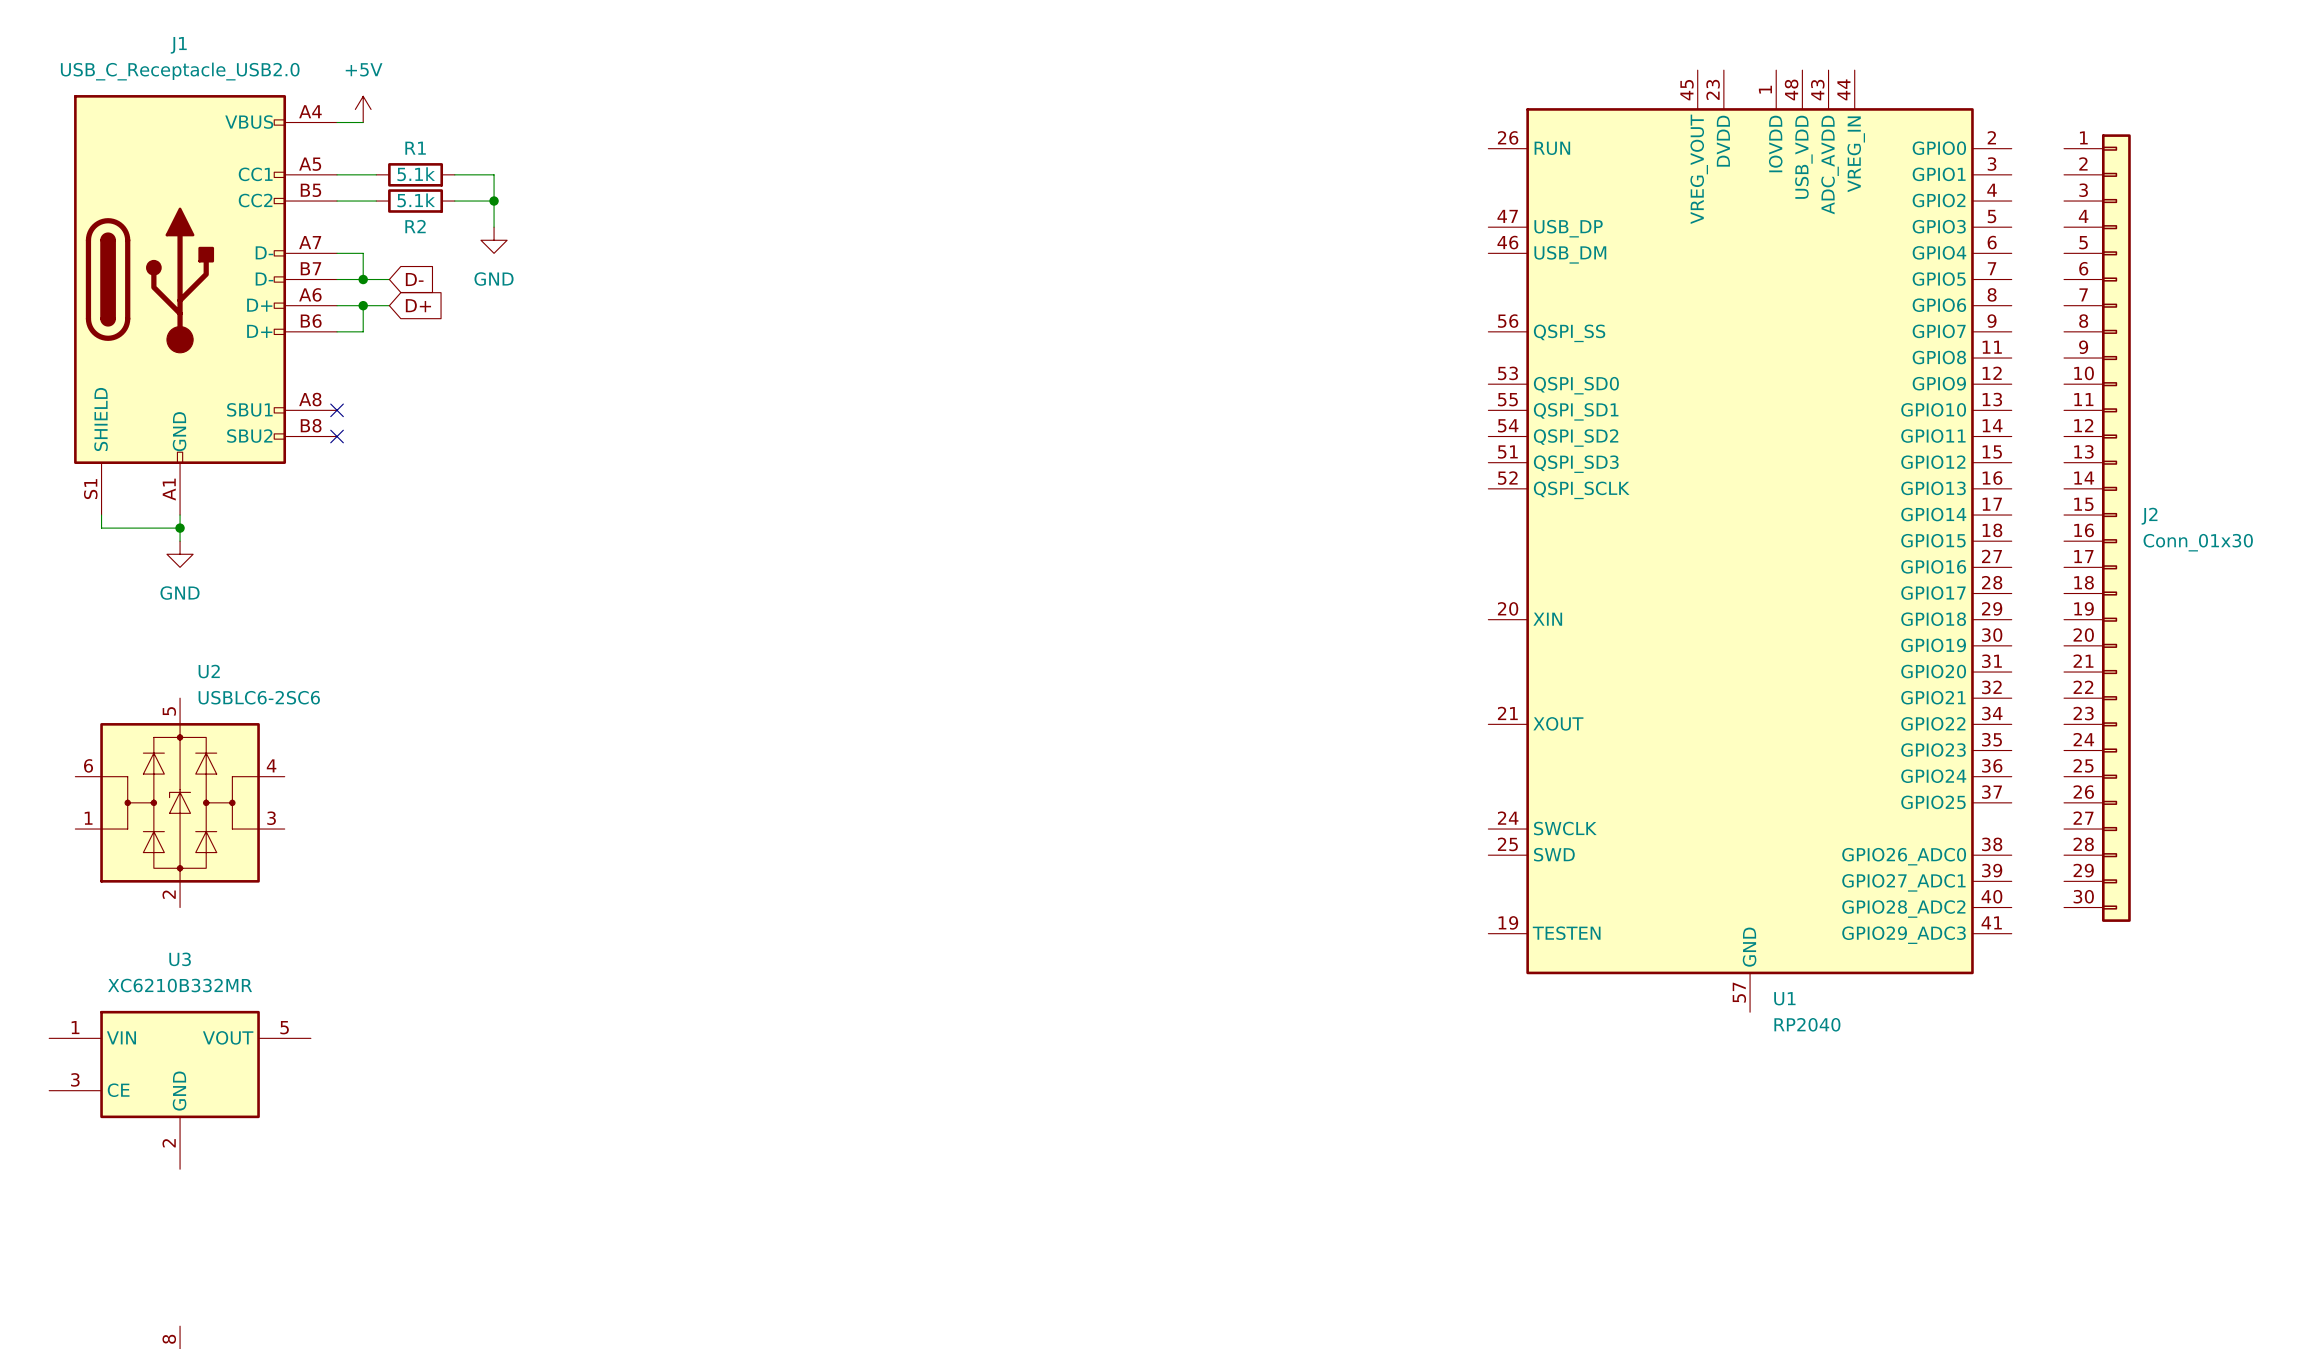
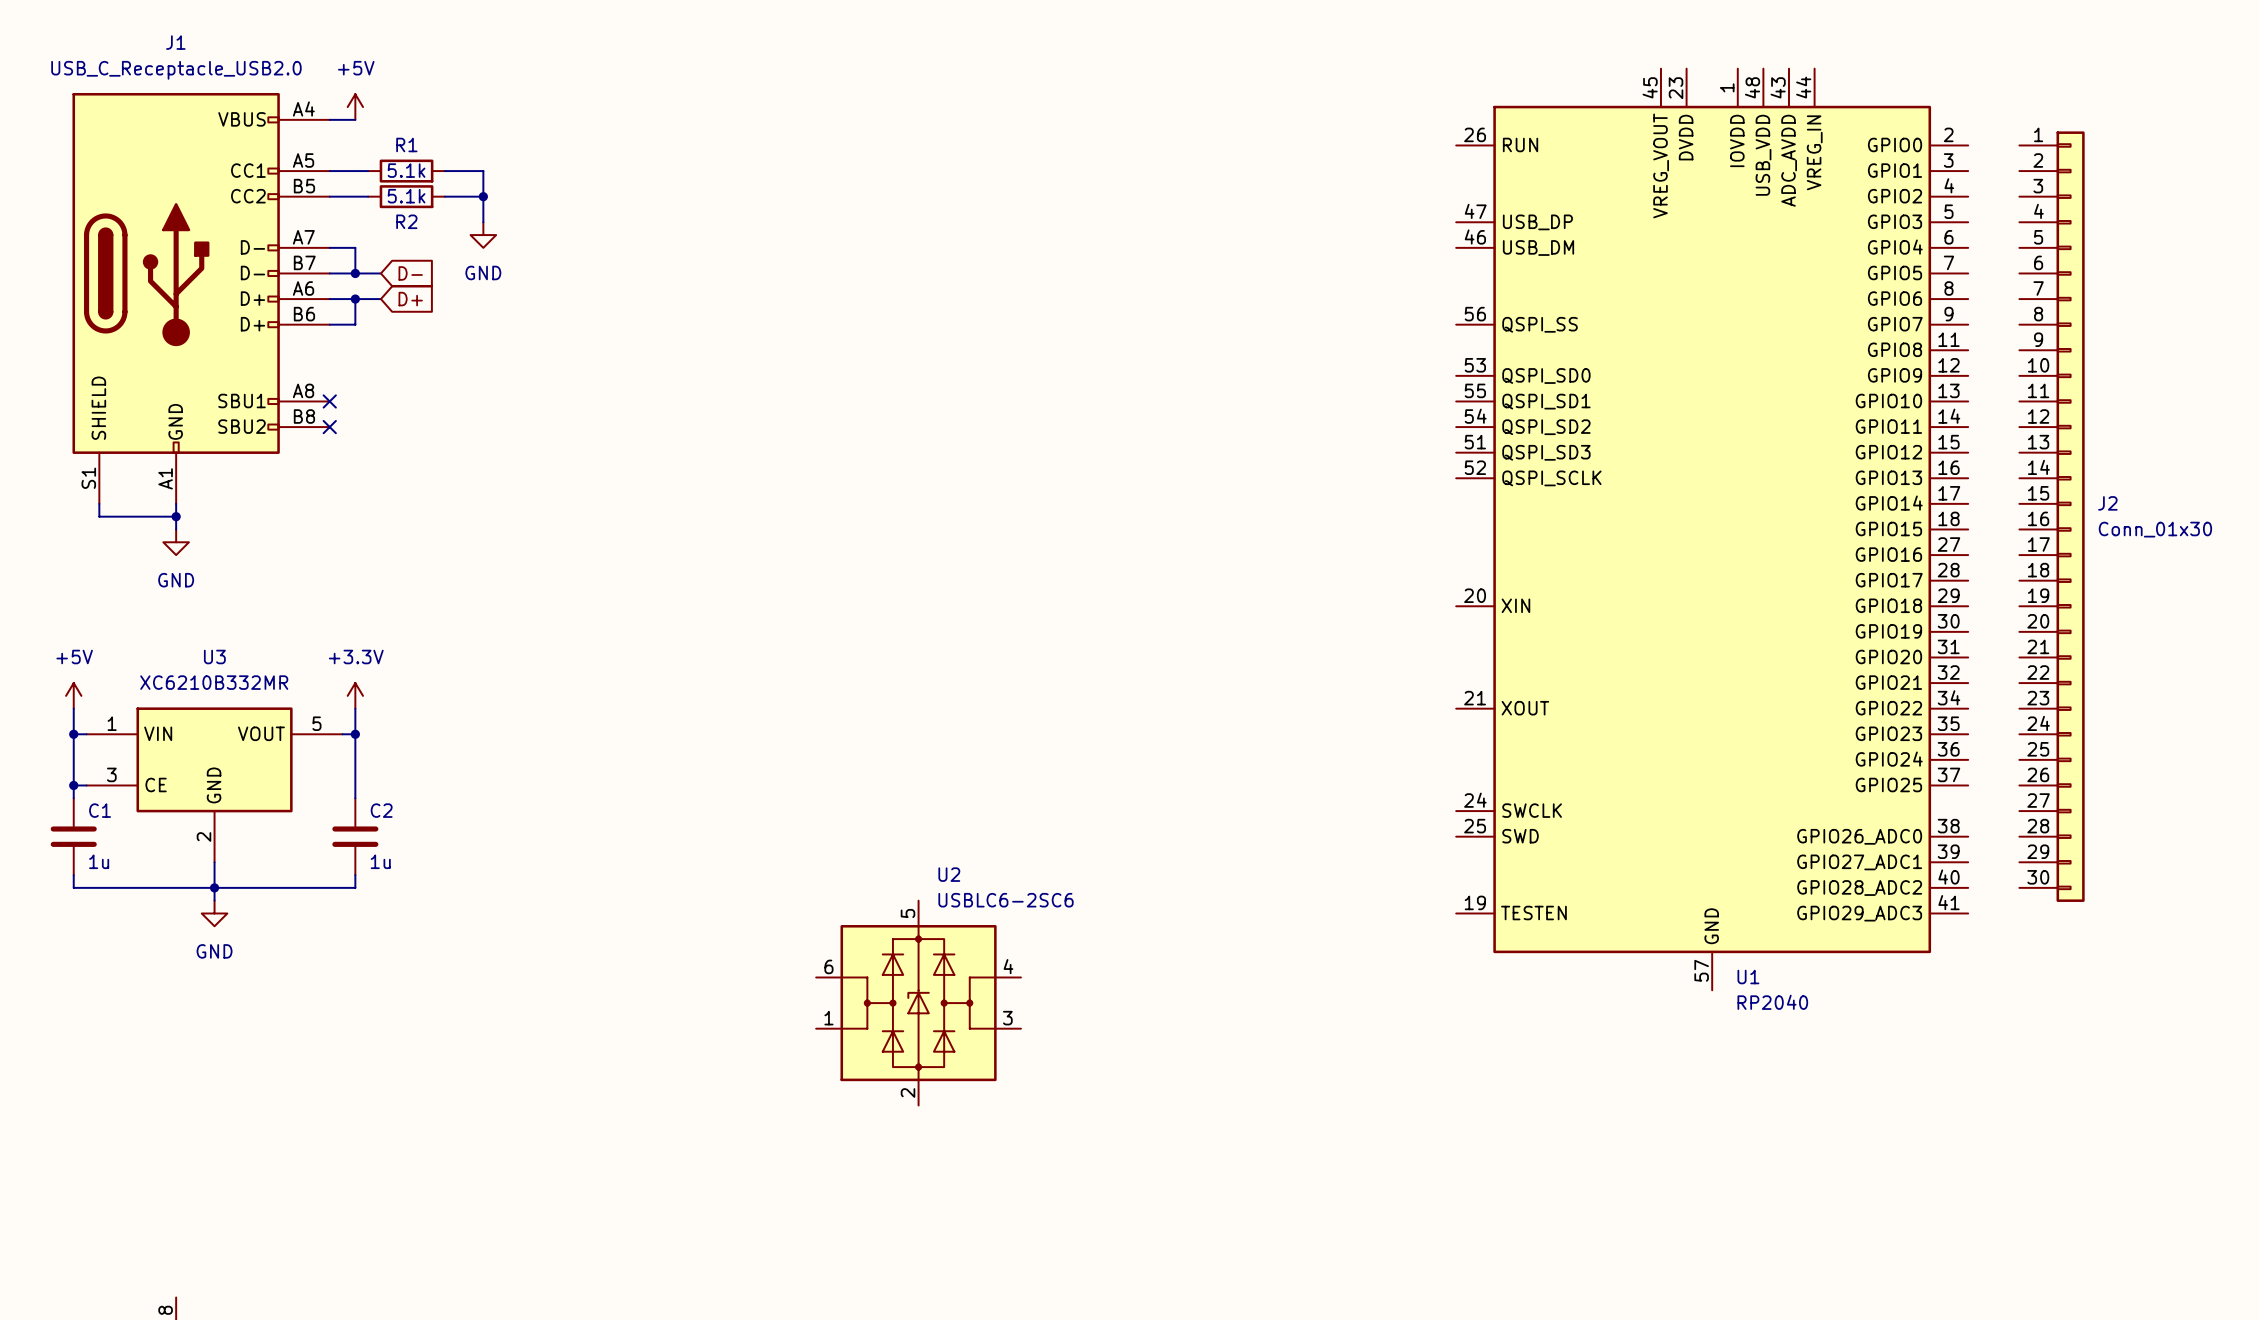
power symbol: none -> +5V (73, 695)
power symbol: none -> +3.3V (355, 695)
wire: none -> (73, 708) (73, 798)
wire: none -> (355, 708) (355, 798)
wire: none -> (73, 734) (86, 734)
junction: none -> (73, 734)
wire: none -> (342, 734) (355, 734)
junction: none -> (355, 734)
wire: none -> (73, 785) (86, 785)
junction: none -> (73, 785)
U2 position: (180, 802) -> (918, 1003)
C1: none -> 1u (73, 836)
C2: none -> 1u (355, 836)
wire: none -> (214, 862) (214, 900)
wire: none -> (73, 875) (73, 887) (355, 887) (355, 875)
junction: none -> (214, 887)
power symbol: none -> GND (214, 913)
U3 position: (180, 1090) -> (214, 784)

